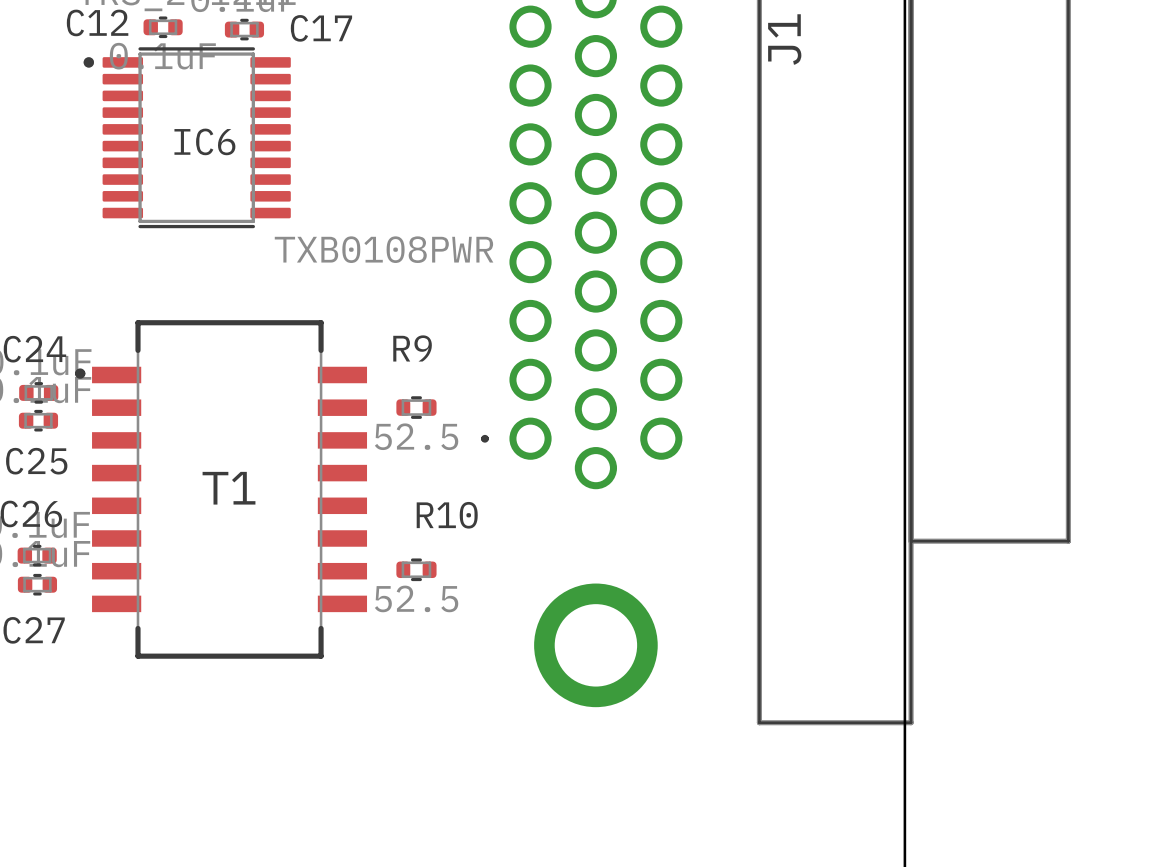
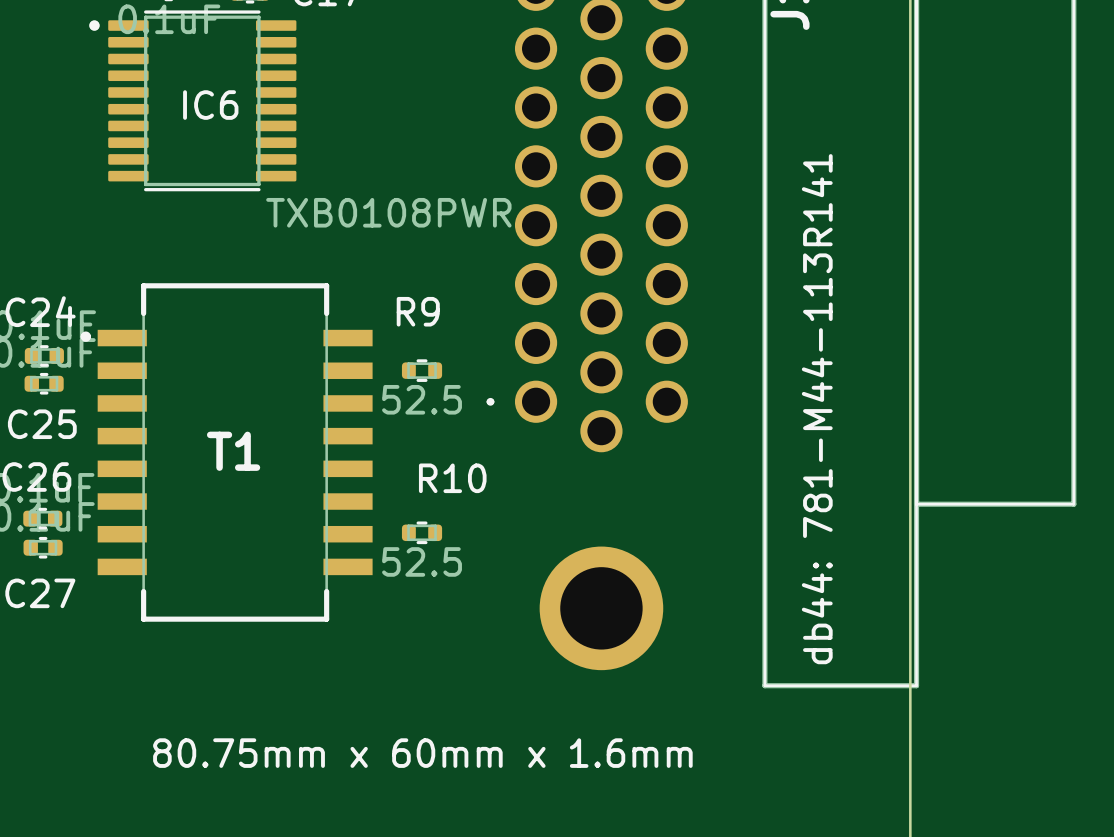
text: none -> db44: 781-M44-113R141 (817, 409)
text: none -> 80.75mm x 60mm x 1.6mm (422, 753)

